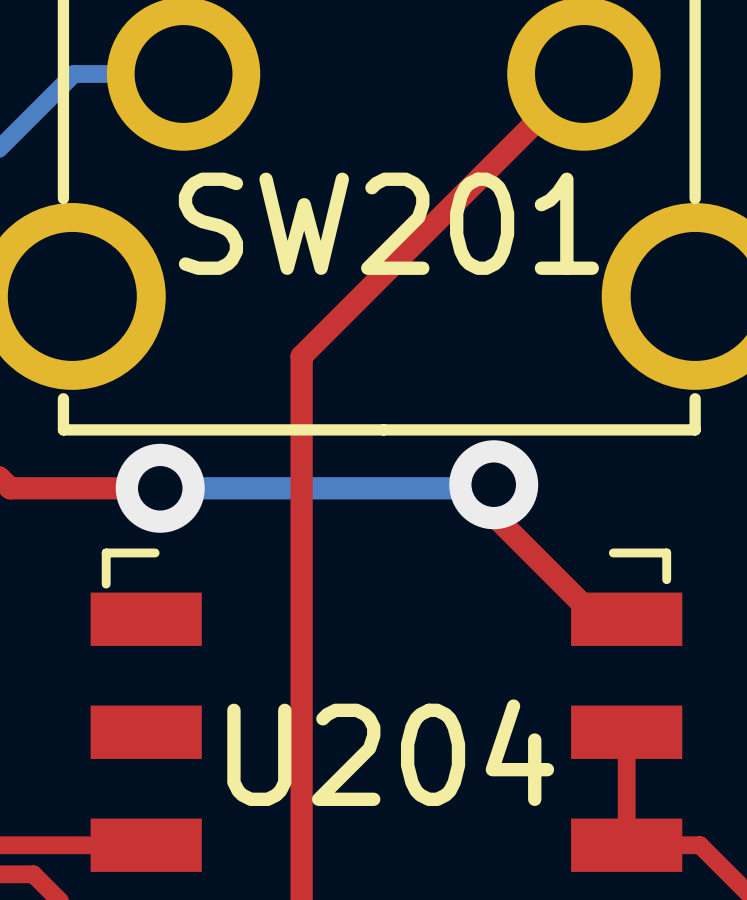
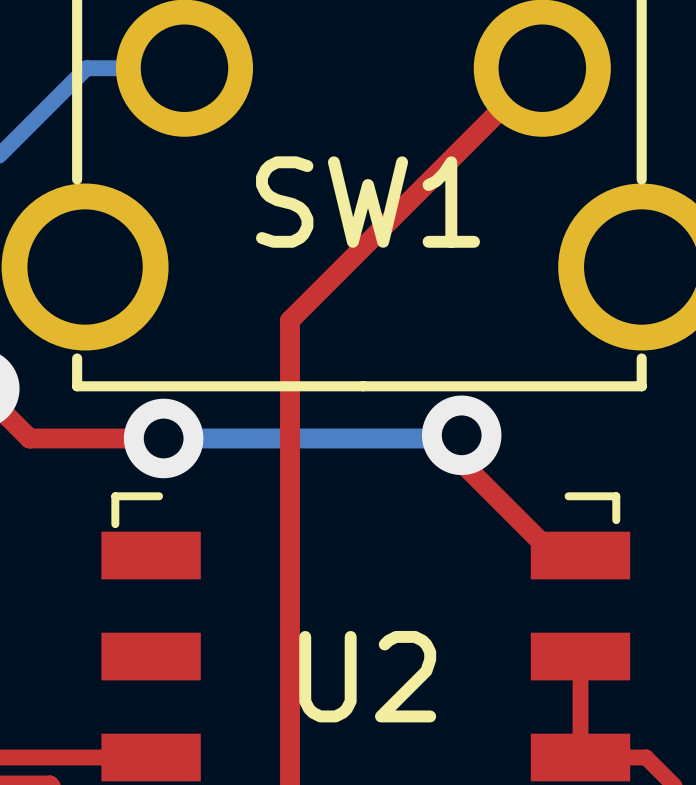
SW201 name: SW201 (388, 223) -> SW1 (368, 202)
U204 name: U204 (390, 752) -> U2 (367, 676)

